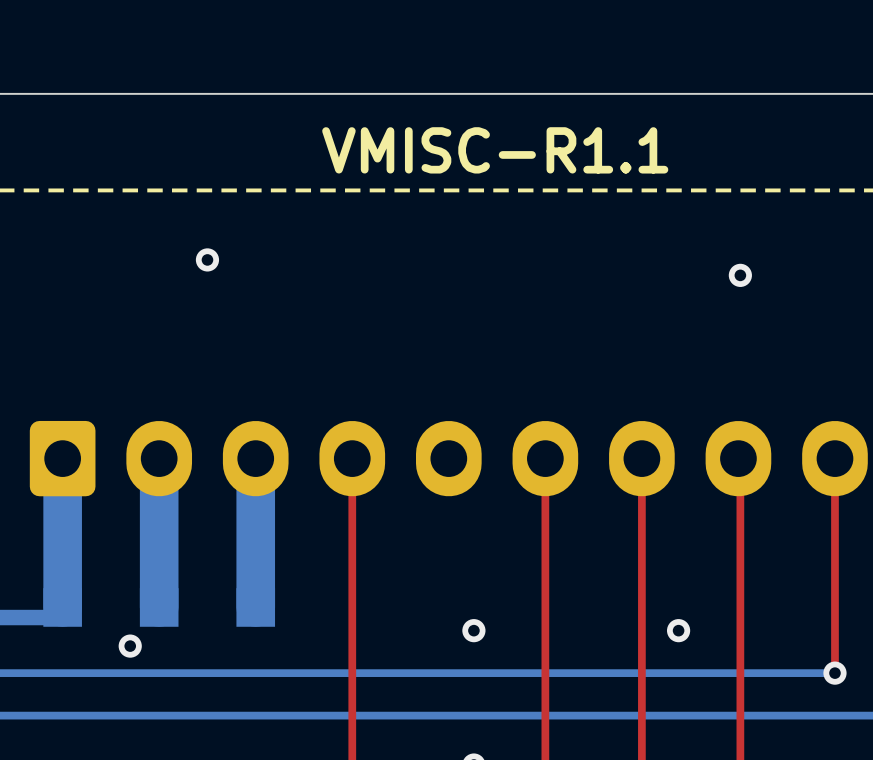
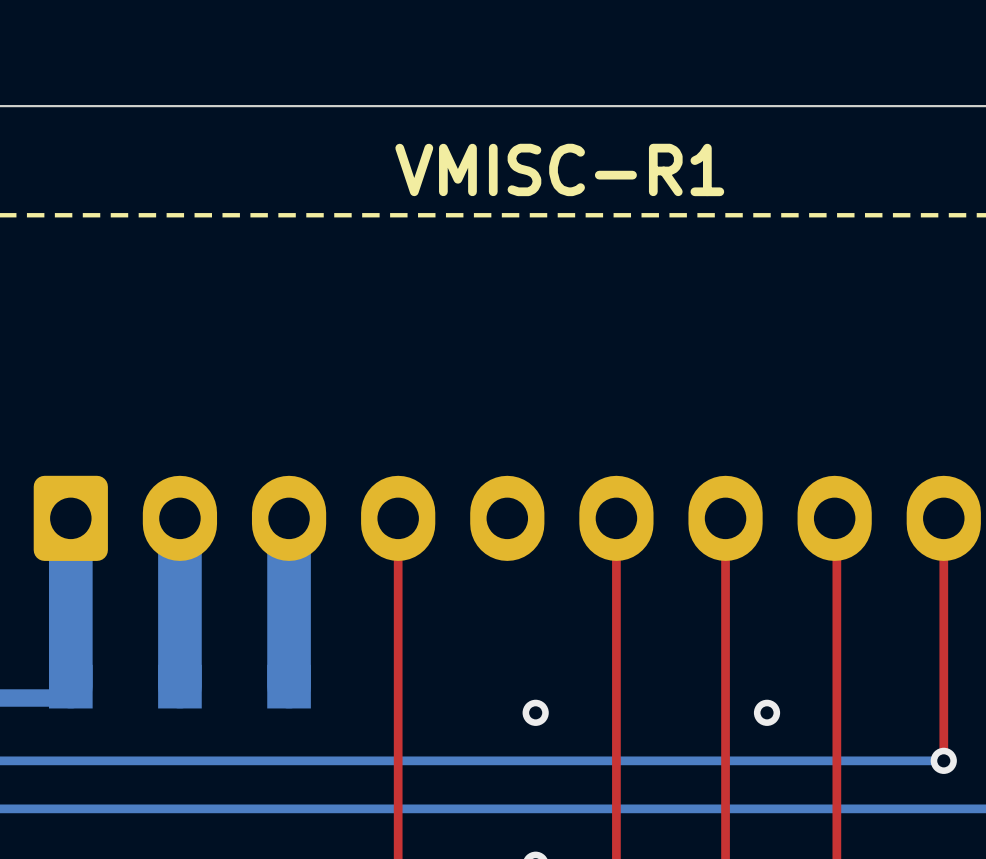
text: VMISC-R1.1 (495, 150) -> VMISC-R1 (559, 169)
via: (207, 259) -> none
via: (740, 275) -> none
via: (130, 646) -> none

